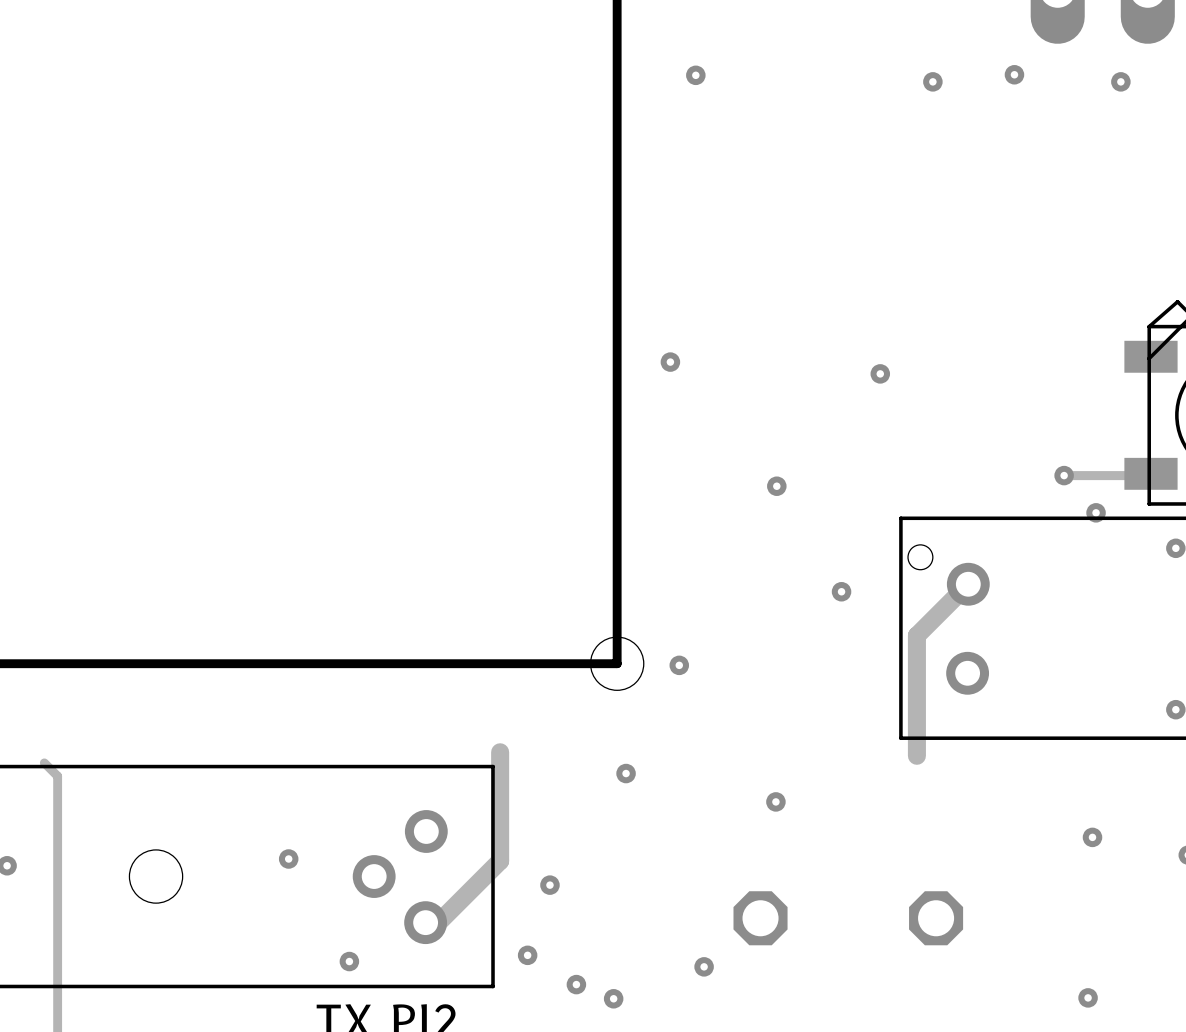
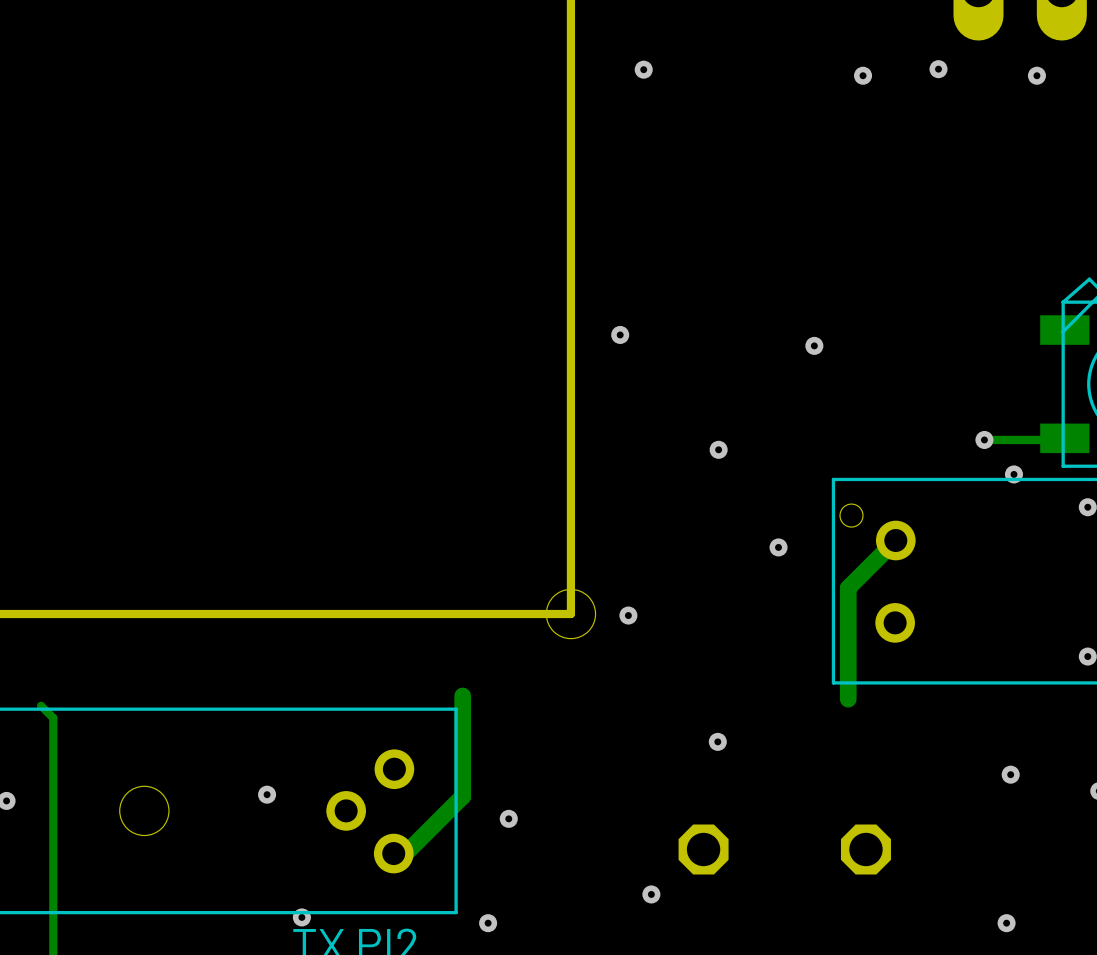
via: (626, 773) -> none
via: (527, 955) -> none
via position: (349, 961) -> (301, 917)
via: (576, 984) -> none
via: none -> (488, 923)
via: (613, 998) -> none

